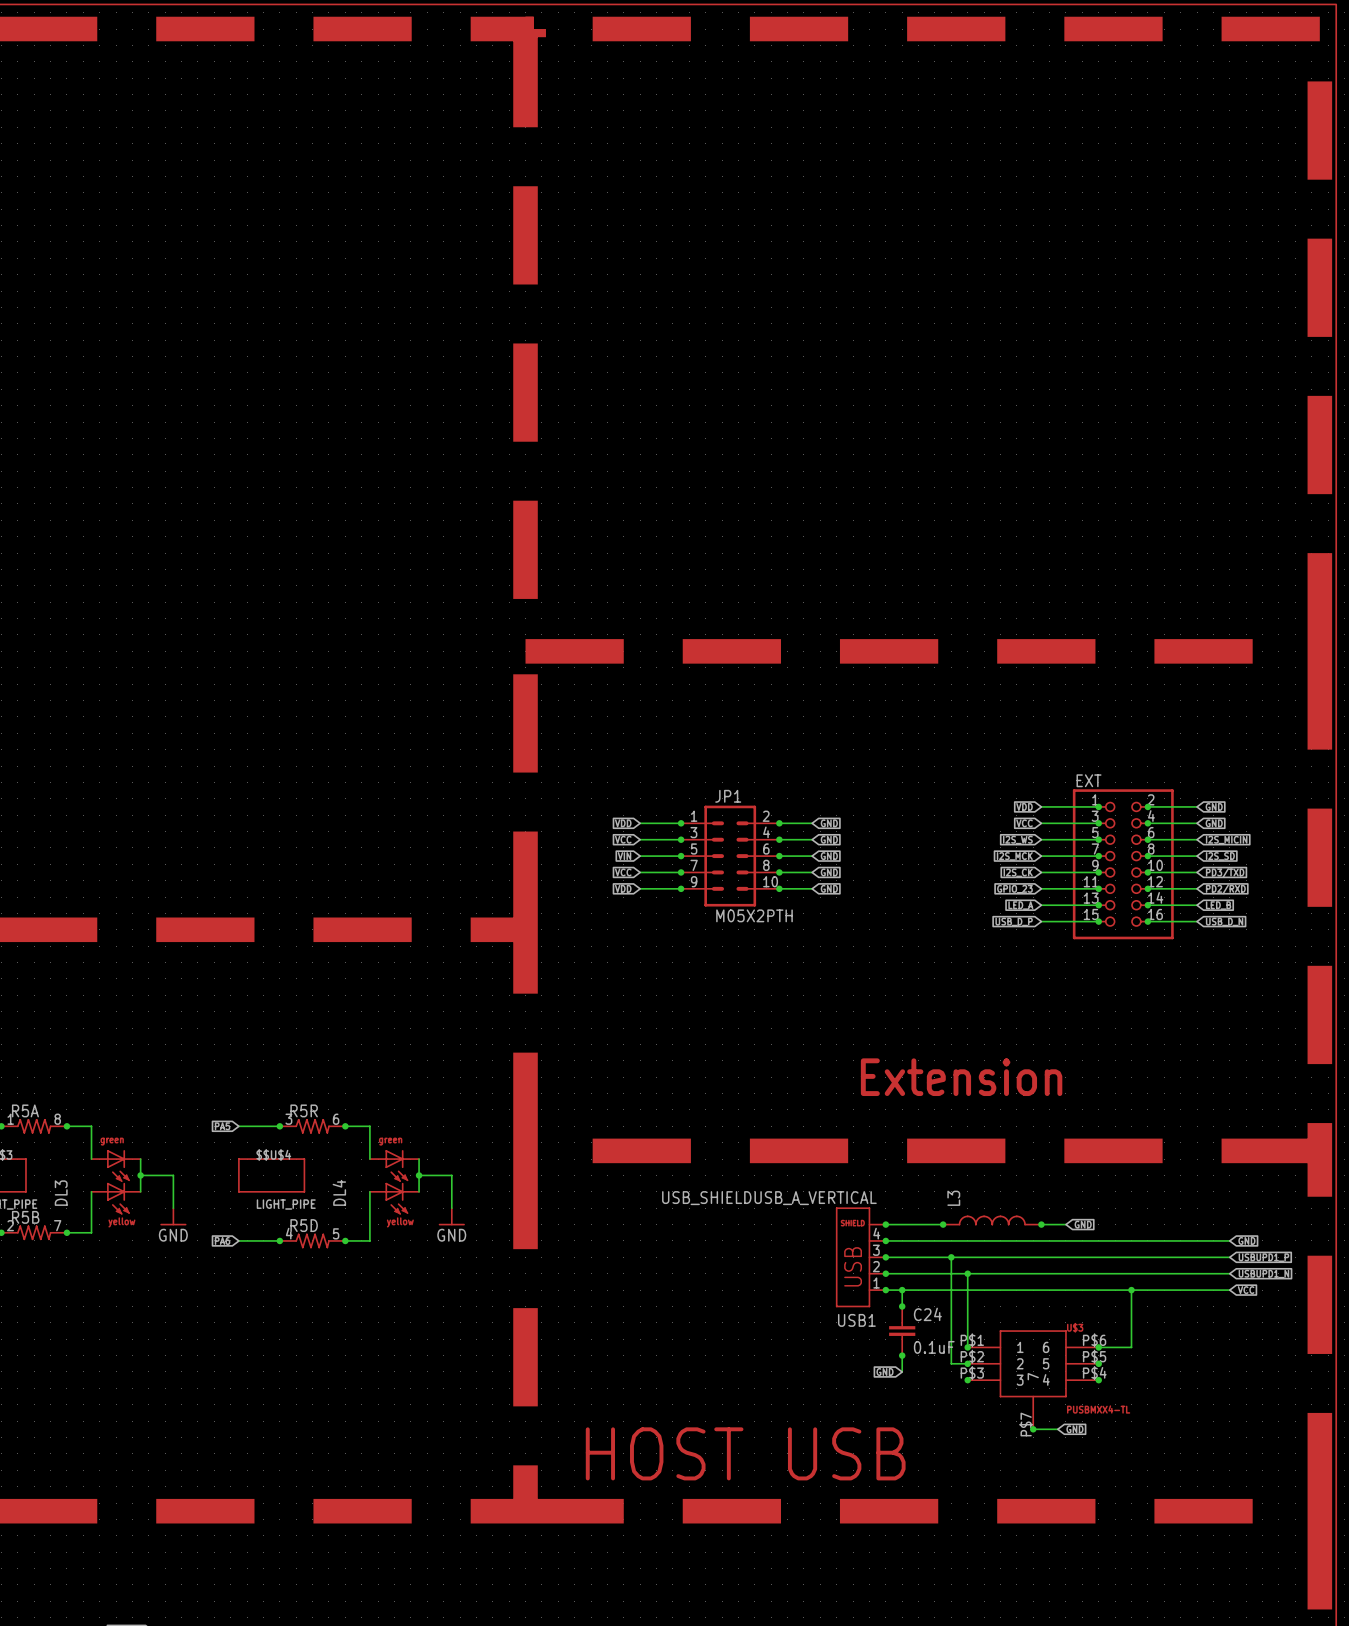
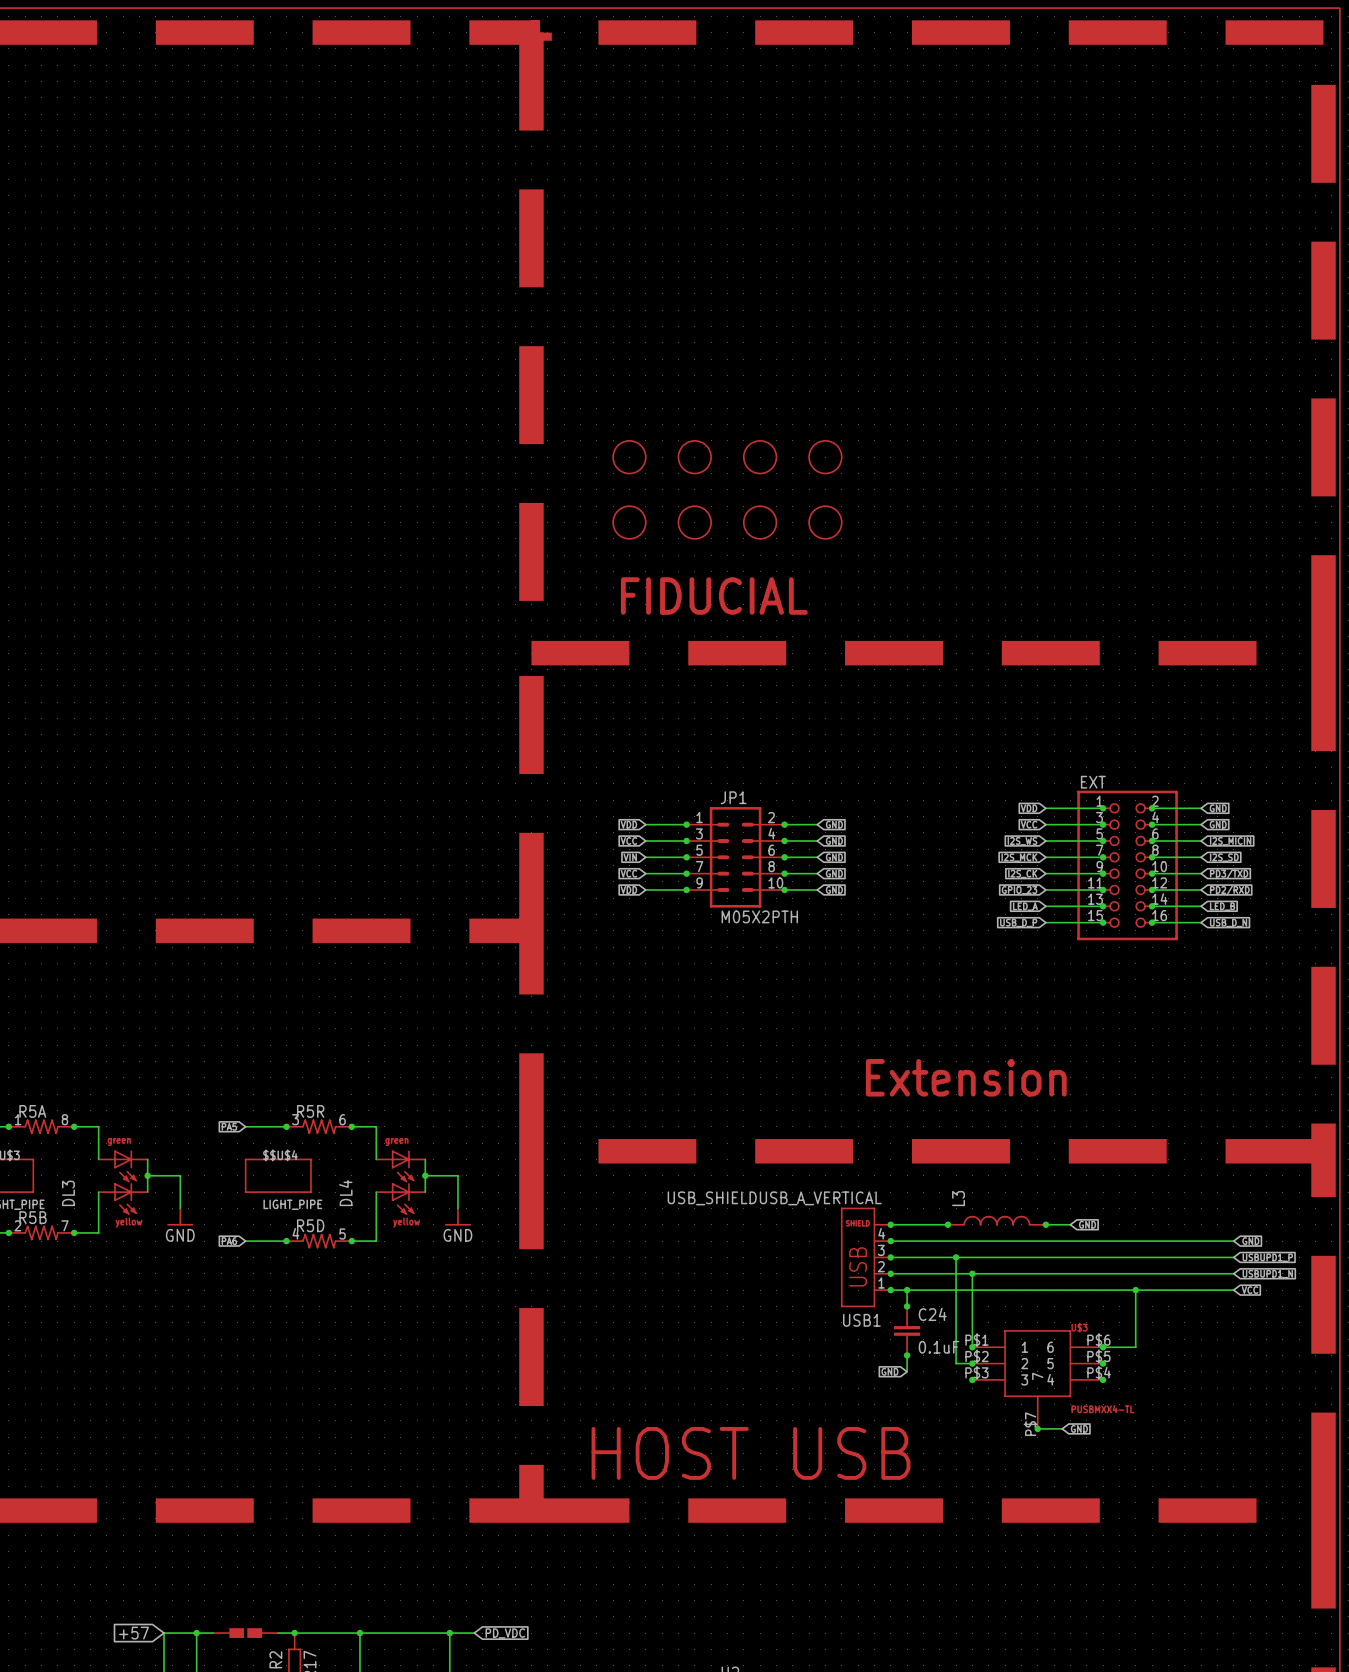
part: none -> (629, 457)
part: none -> (694, 457)
part: none -> (760, 457)
part: none -> (825, 457)
part: none -> (629, 522)
part: none -> (694, 522)
part: none -> (760, 522)
part: none -> (825, 522)
text: none -> FIDUCIAL (714, 596)

